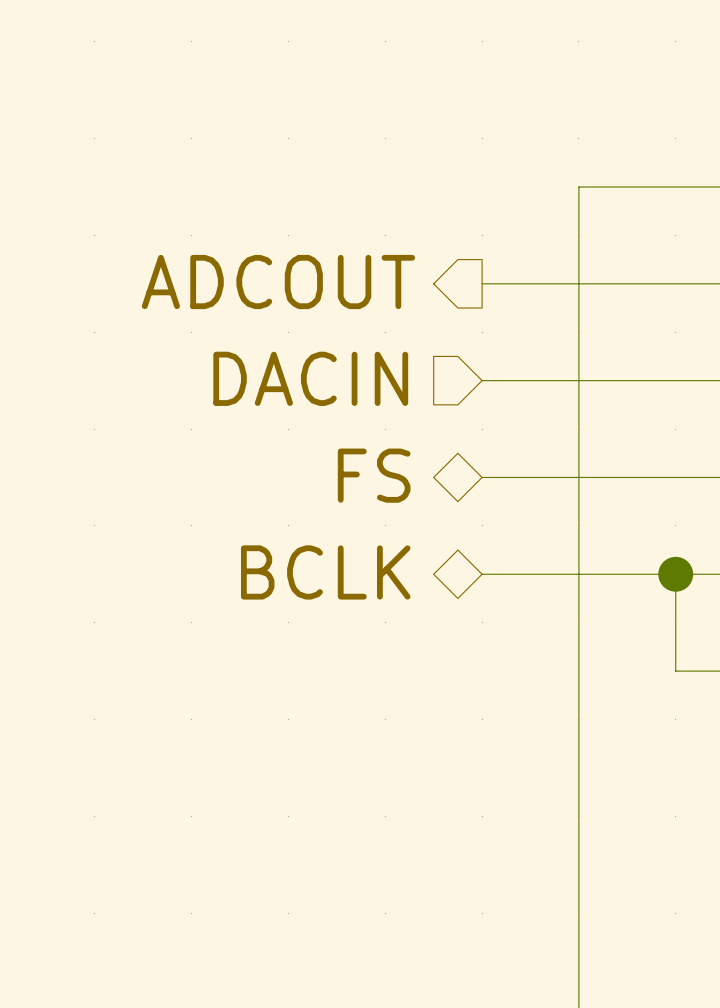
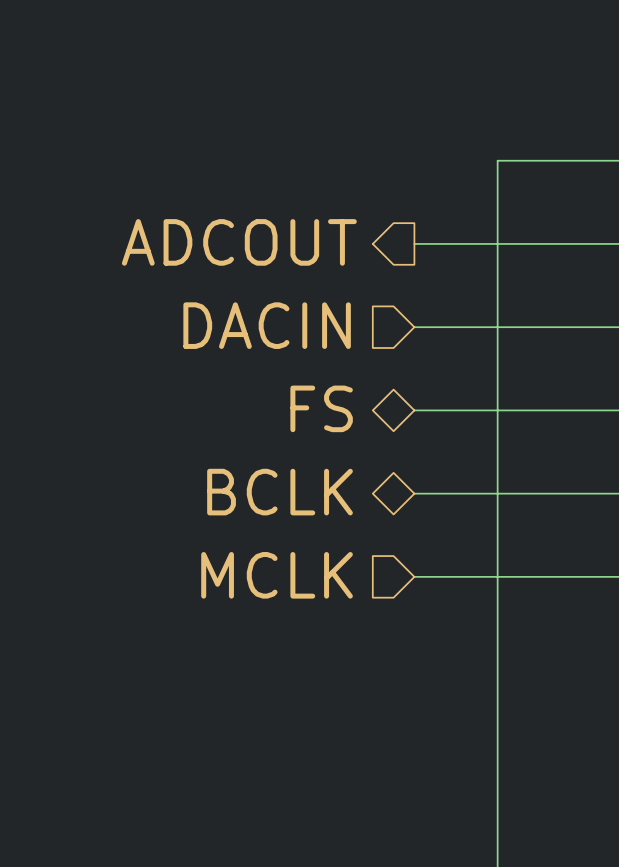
wire: (675, 574) (675, 671) -> (414, 576) (580, 576)
junction: (675, 574) -> none
hierarchical label: none -> MCLK (277, 575)

